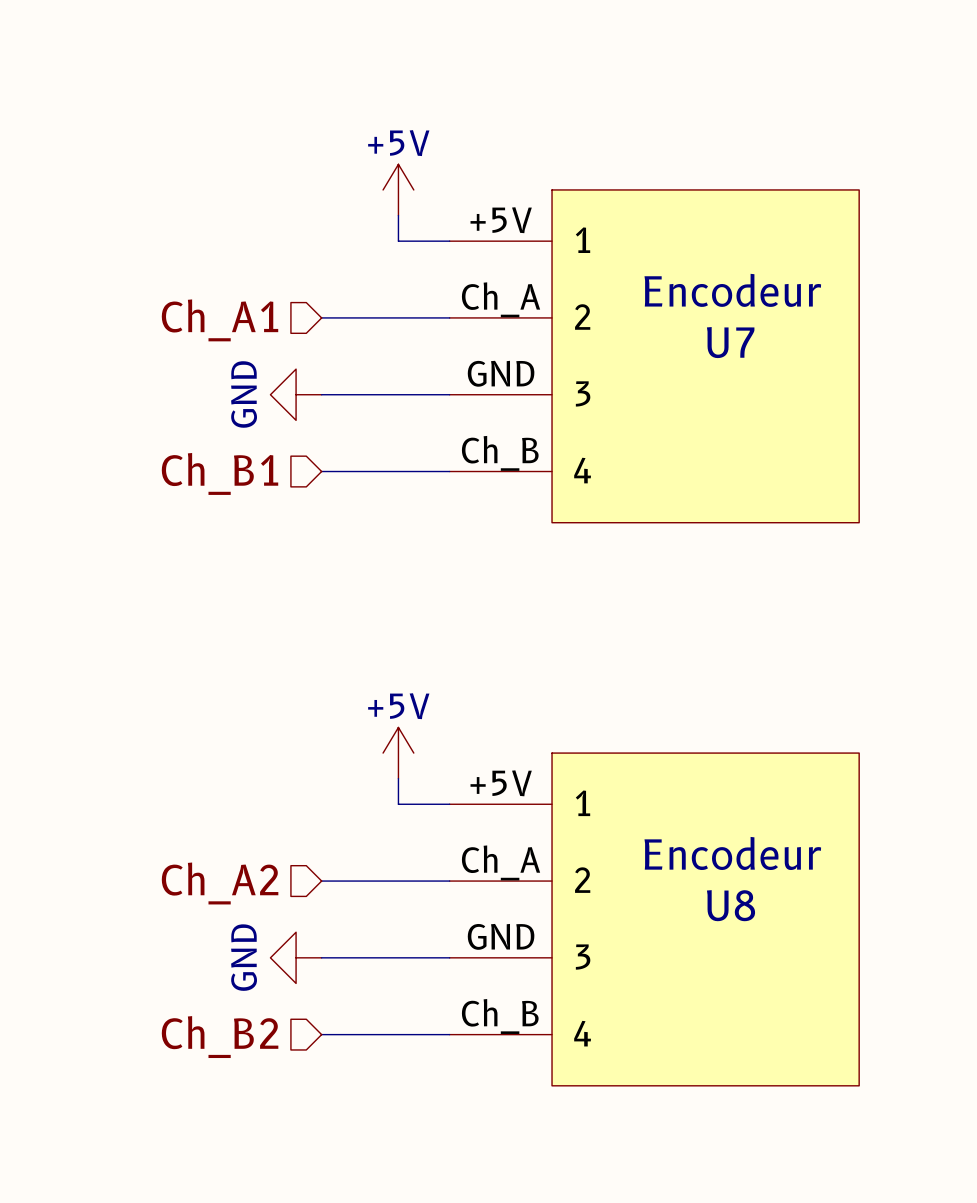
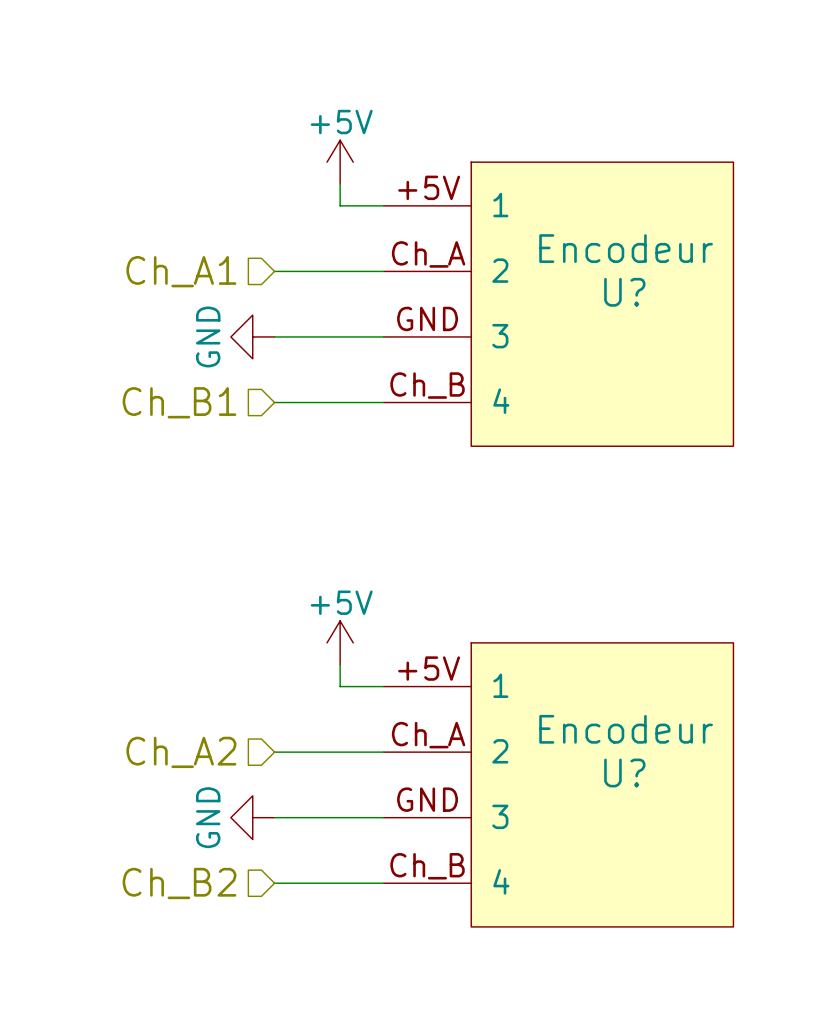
U7 name: U7 (730, 342) -> U? (624, 292)
U8 name: U8 (731, 905) -> U? (624, 772)

